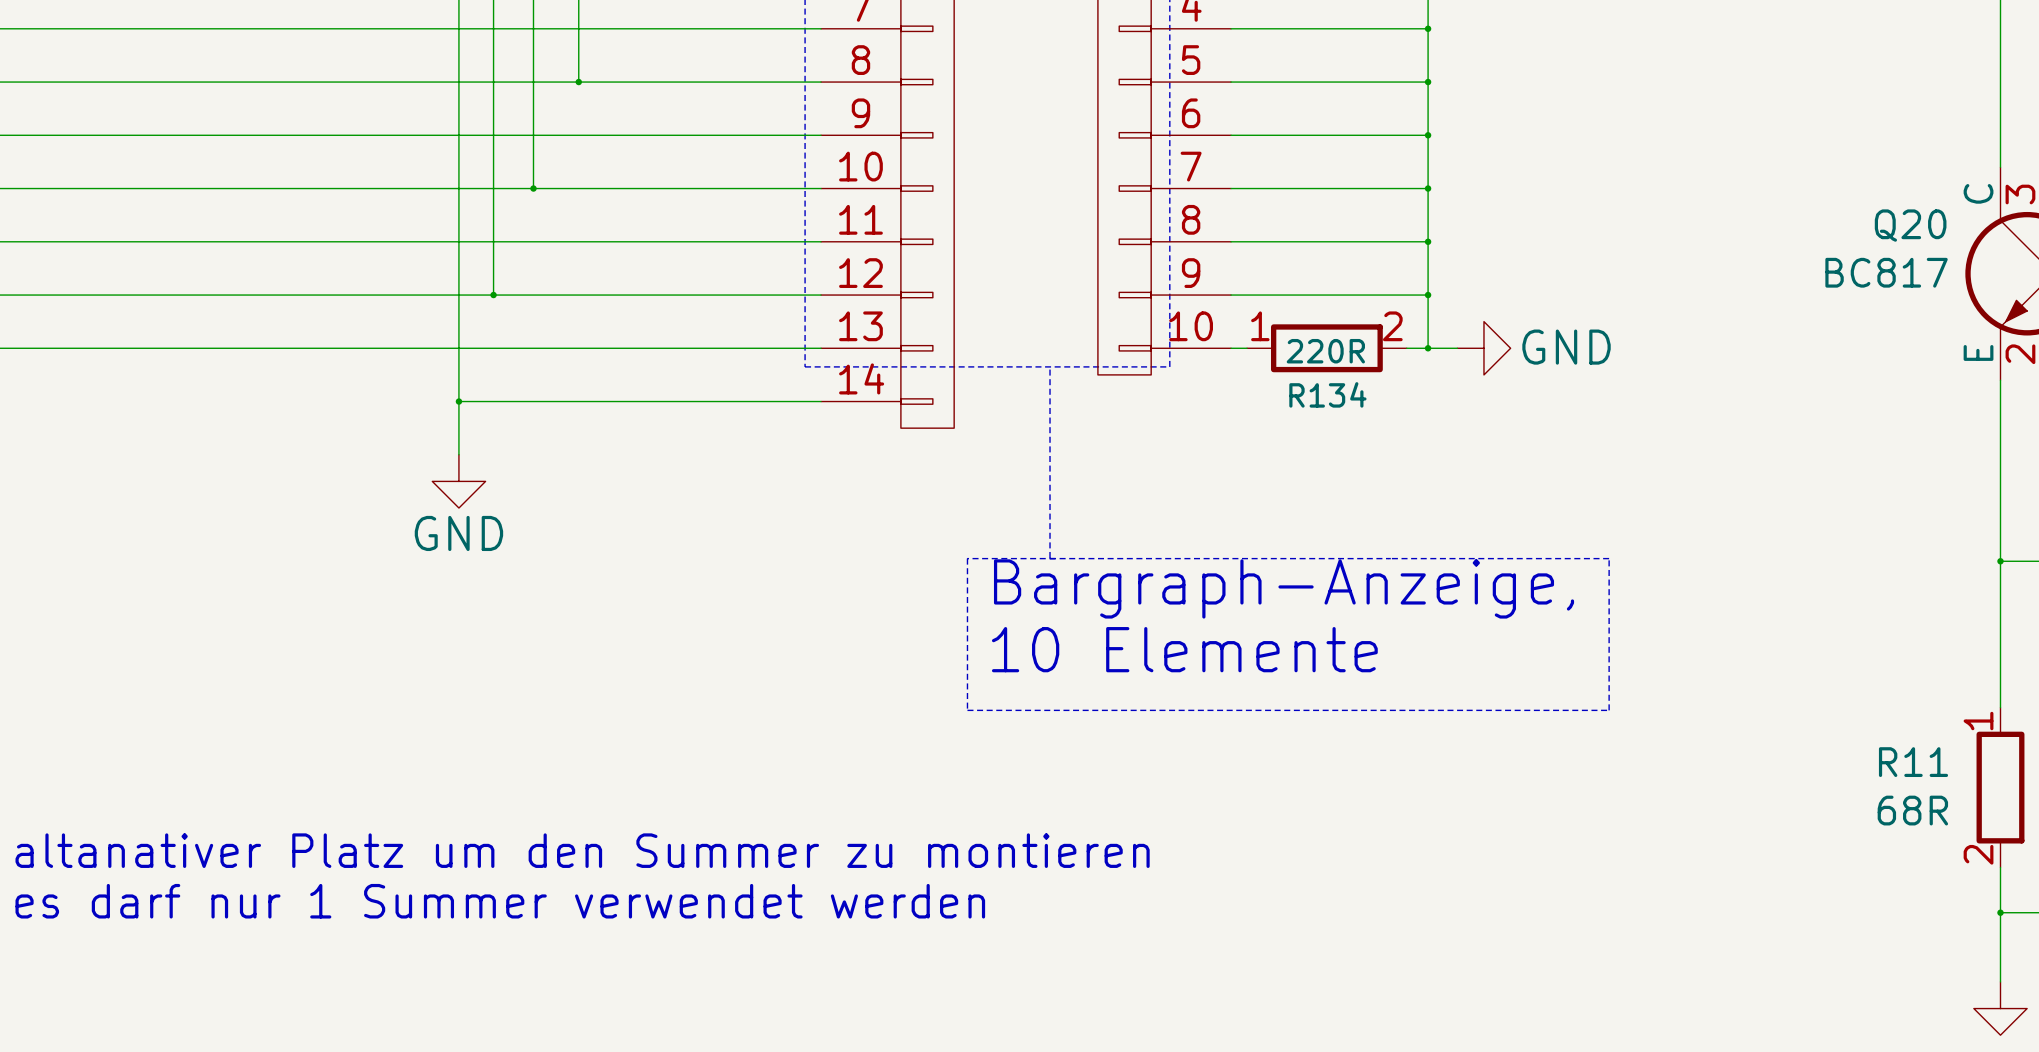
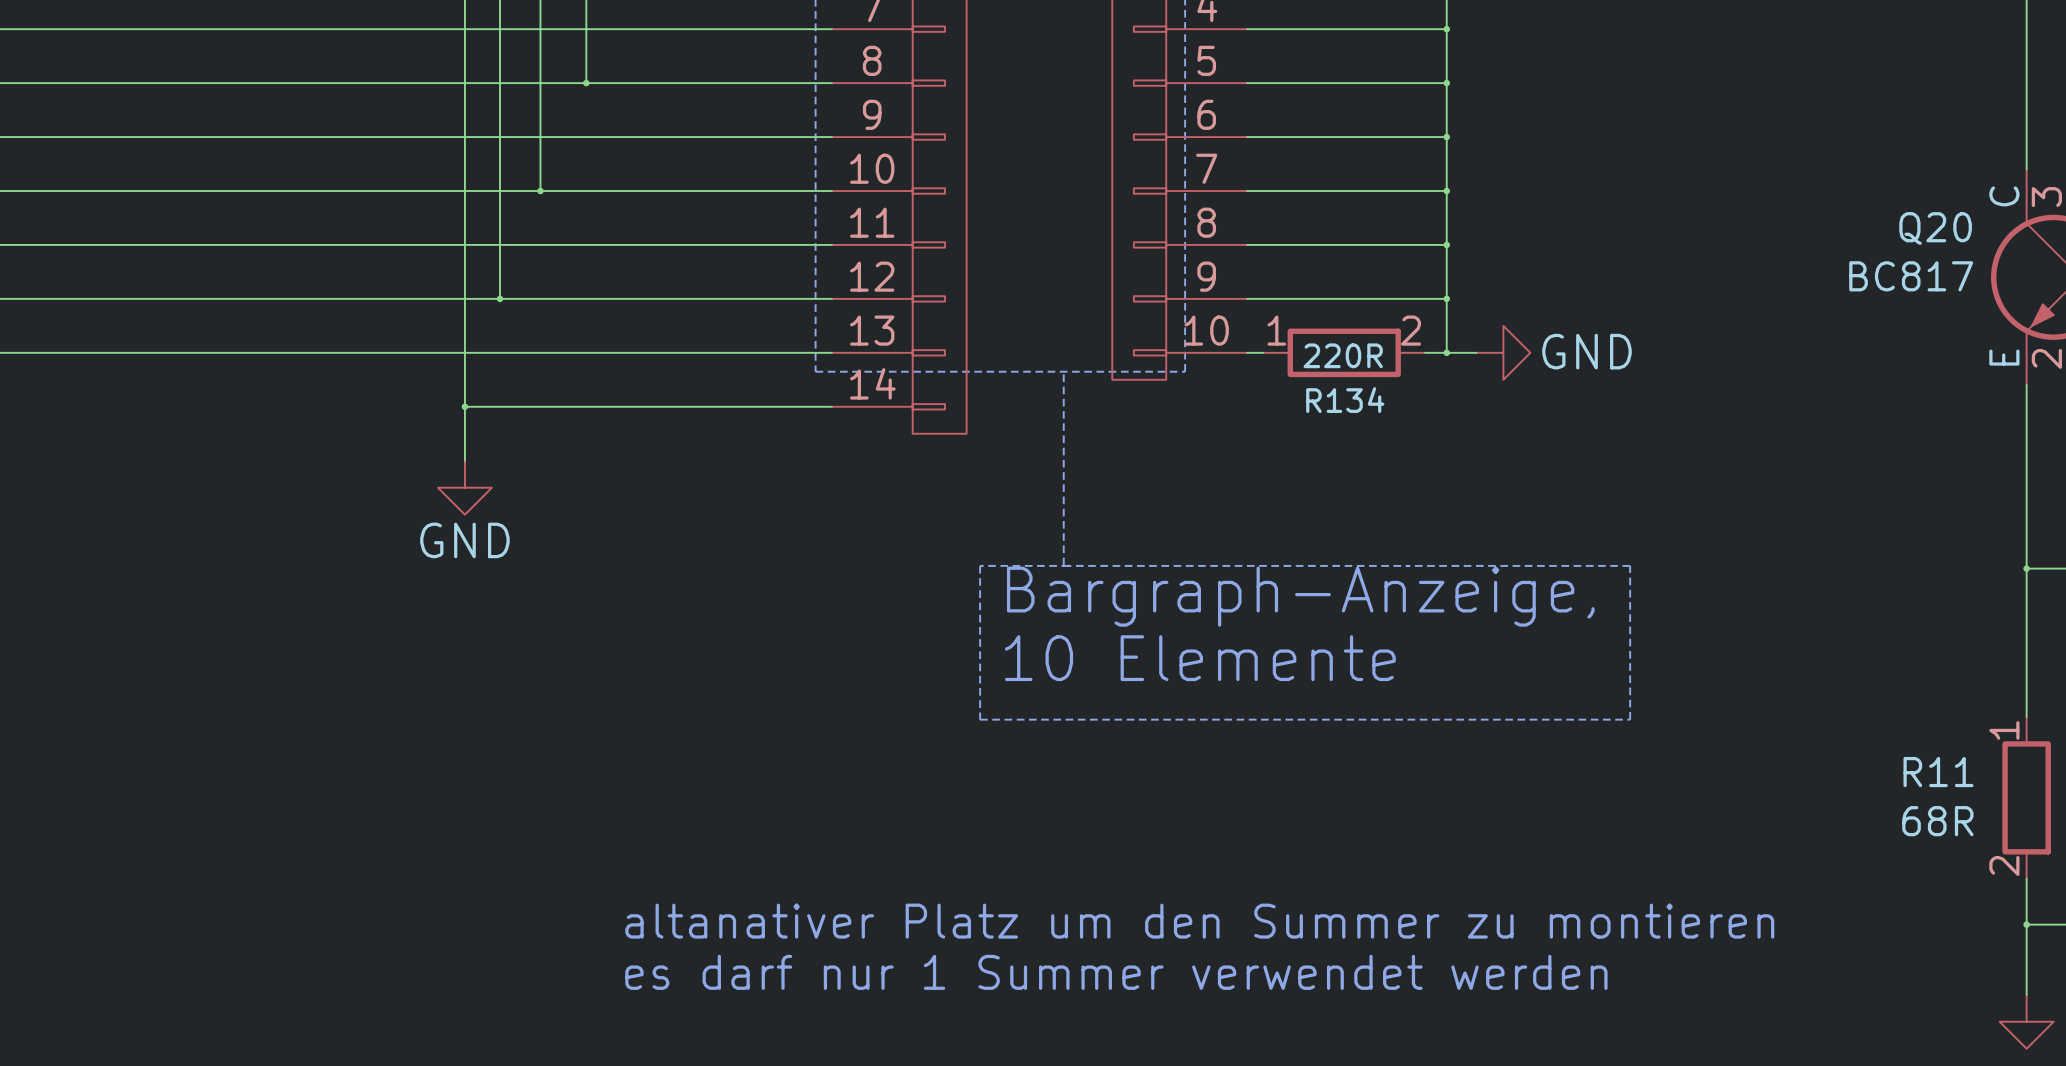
text: altanativer Platz um den Summer zu montieren (582, 850) -> none
text: es darf nur 1 Summer verwendet werden (500, 901) -> none
text: none -> altanativer Platz um den Summer zu montieren (1199, 921)
text: none -> es darf nur 1 Summer verwendet werden (1116, 972)

